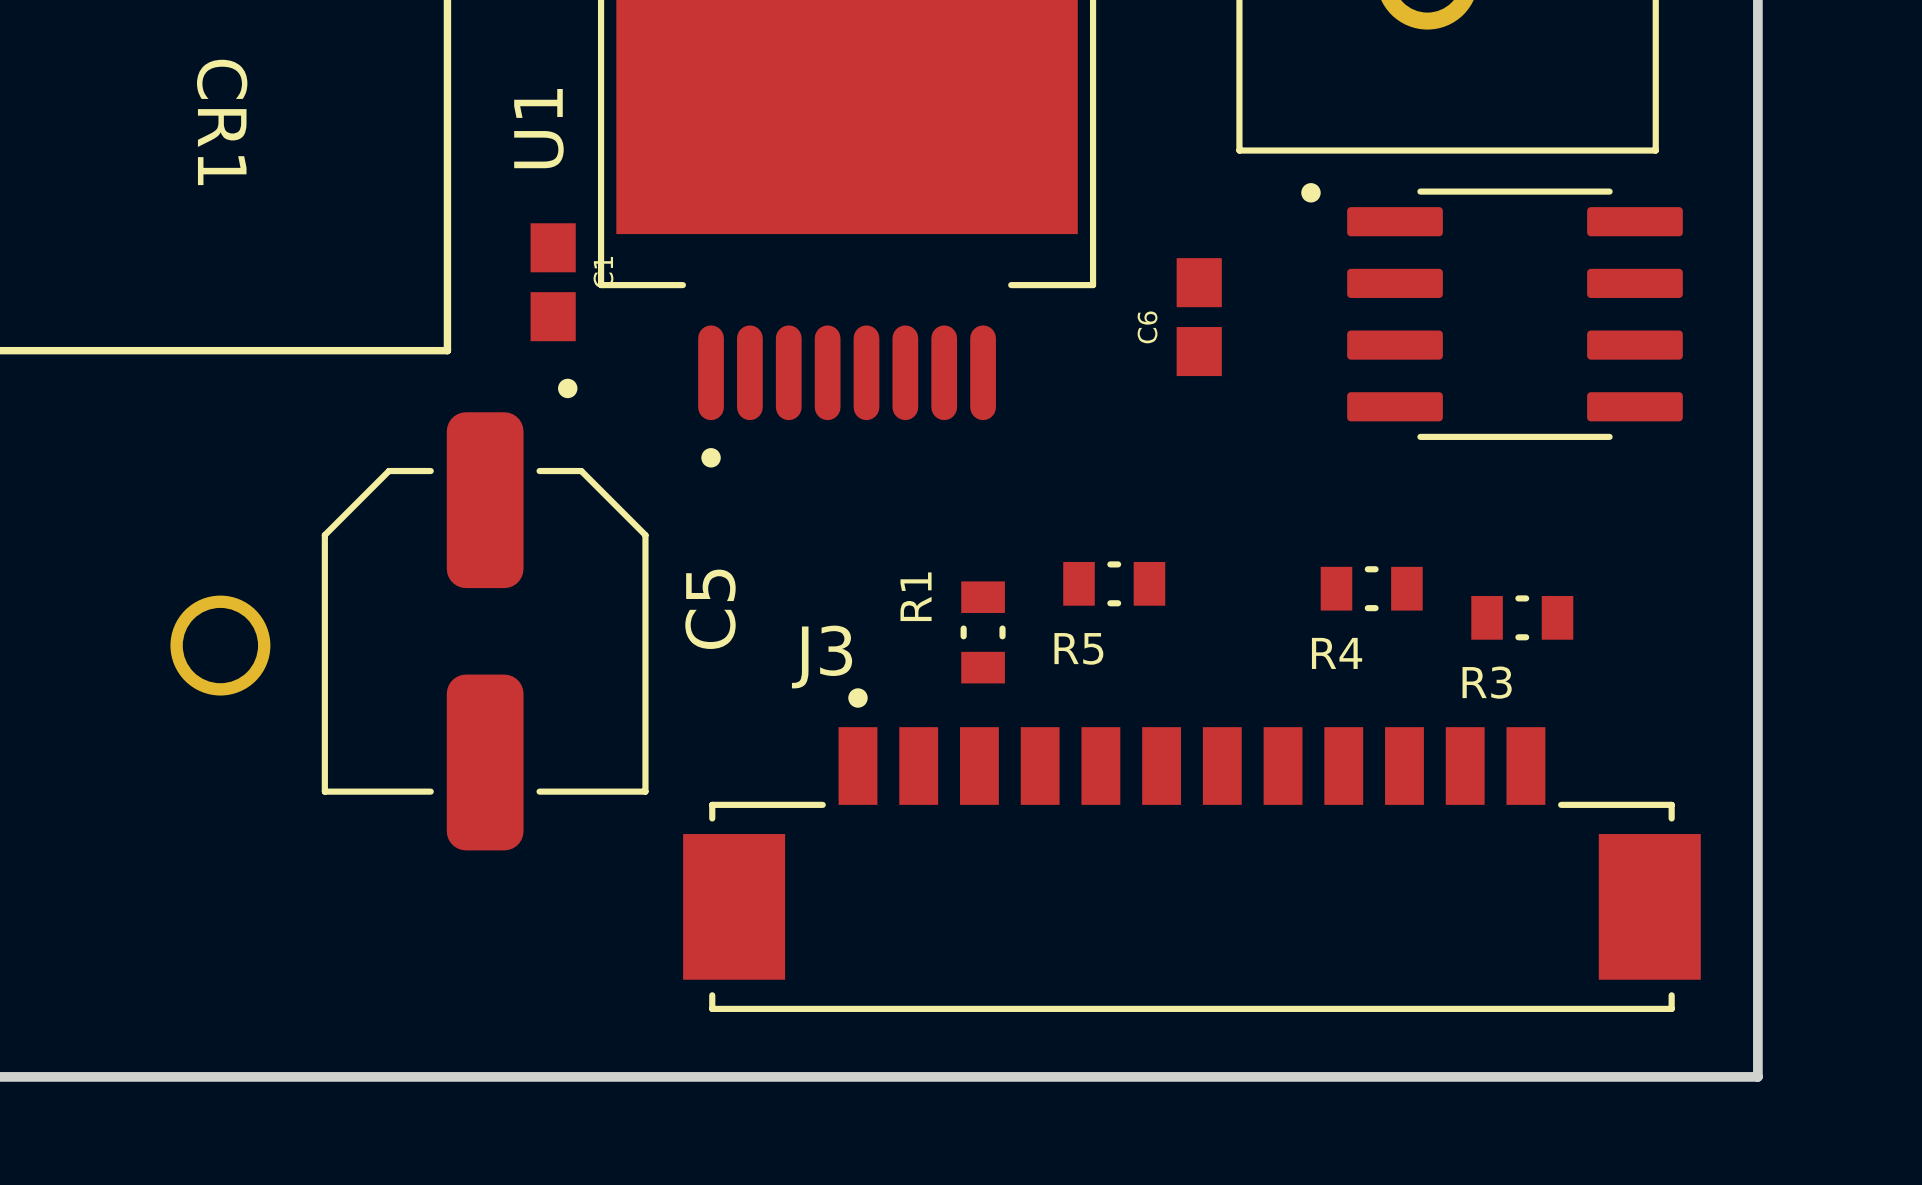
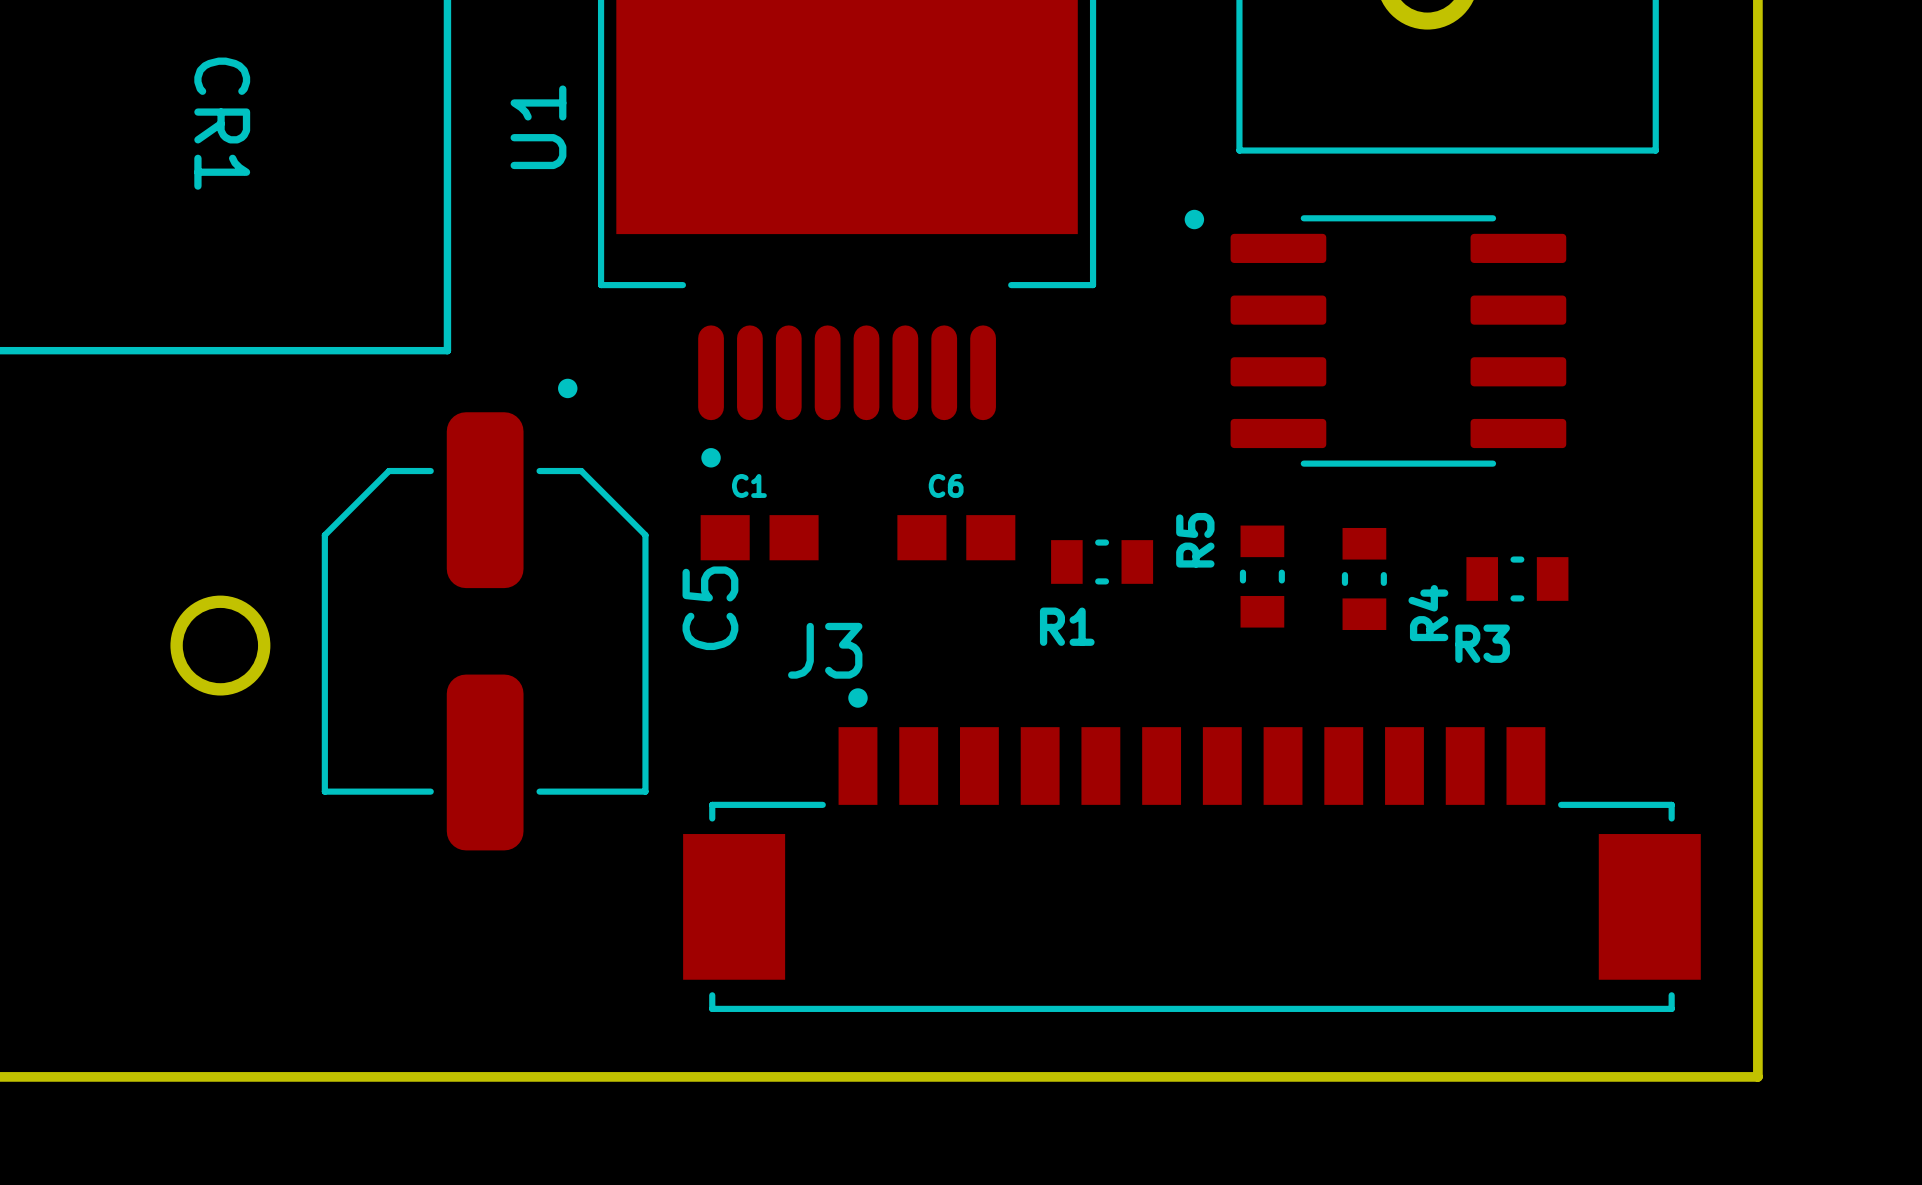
C1 rotation: 0° (553, 282) -> 90° clockwise (759, 537)
C1 position: (553, 282) -> (759, 537)
part position: (1492, 311) -> (1375, 338)
C6 rotation: 0° (1199, 317) -> 90° clockwise (956, 537)
C6 position: (1199, 317) -> (956, 537)
R5 rotation: 0° (1114, 583) -> 90° clockwise (1262, 576)
R5 position: (1114, 583) -> (1262, 576)
R4 rotation: 0° (1371, 588) -> 90° clockwise (1364, 578)
R1 name position: R1 (916, 596) -> R1 (1067, 626)
R3 position: (1522, 617) -> (1517, 578)
R1 rotation: 0° (983, 632) -> 90° clockwise (1102, 561)
R1 position: (983, 632) -> (1102, 561)
R4 name position: R4 (1337, 653) -> R4 (1428, 613)

